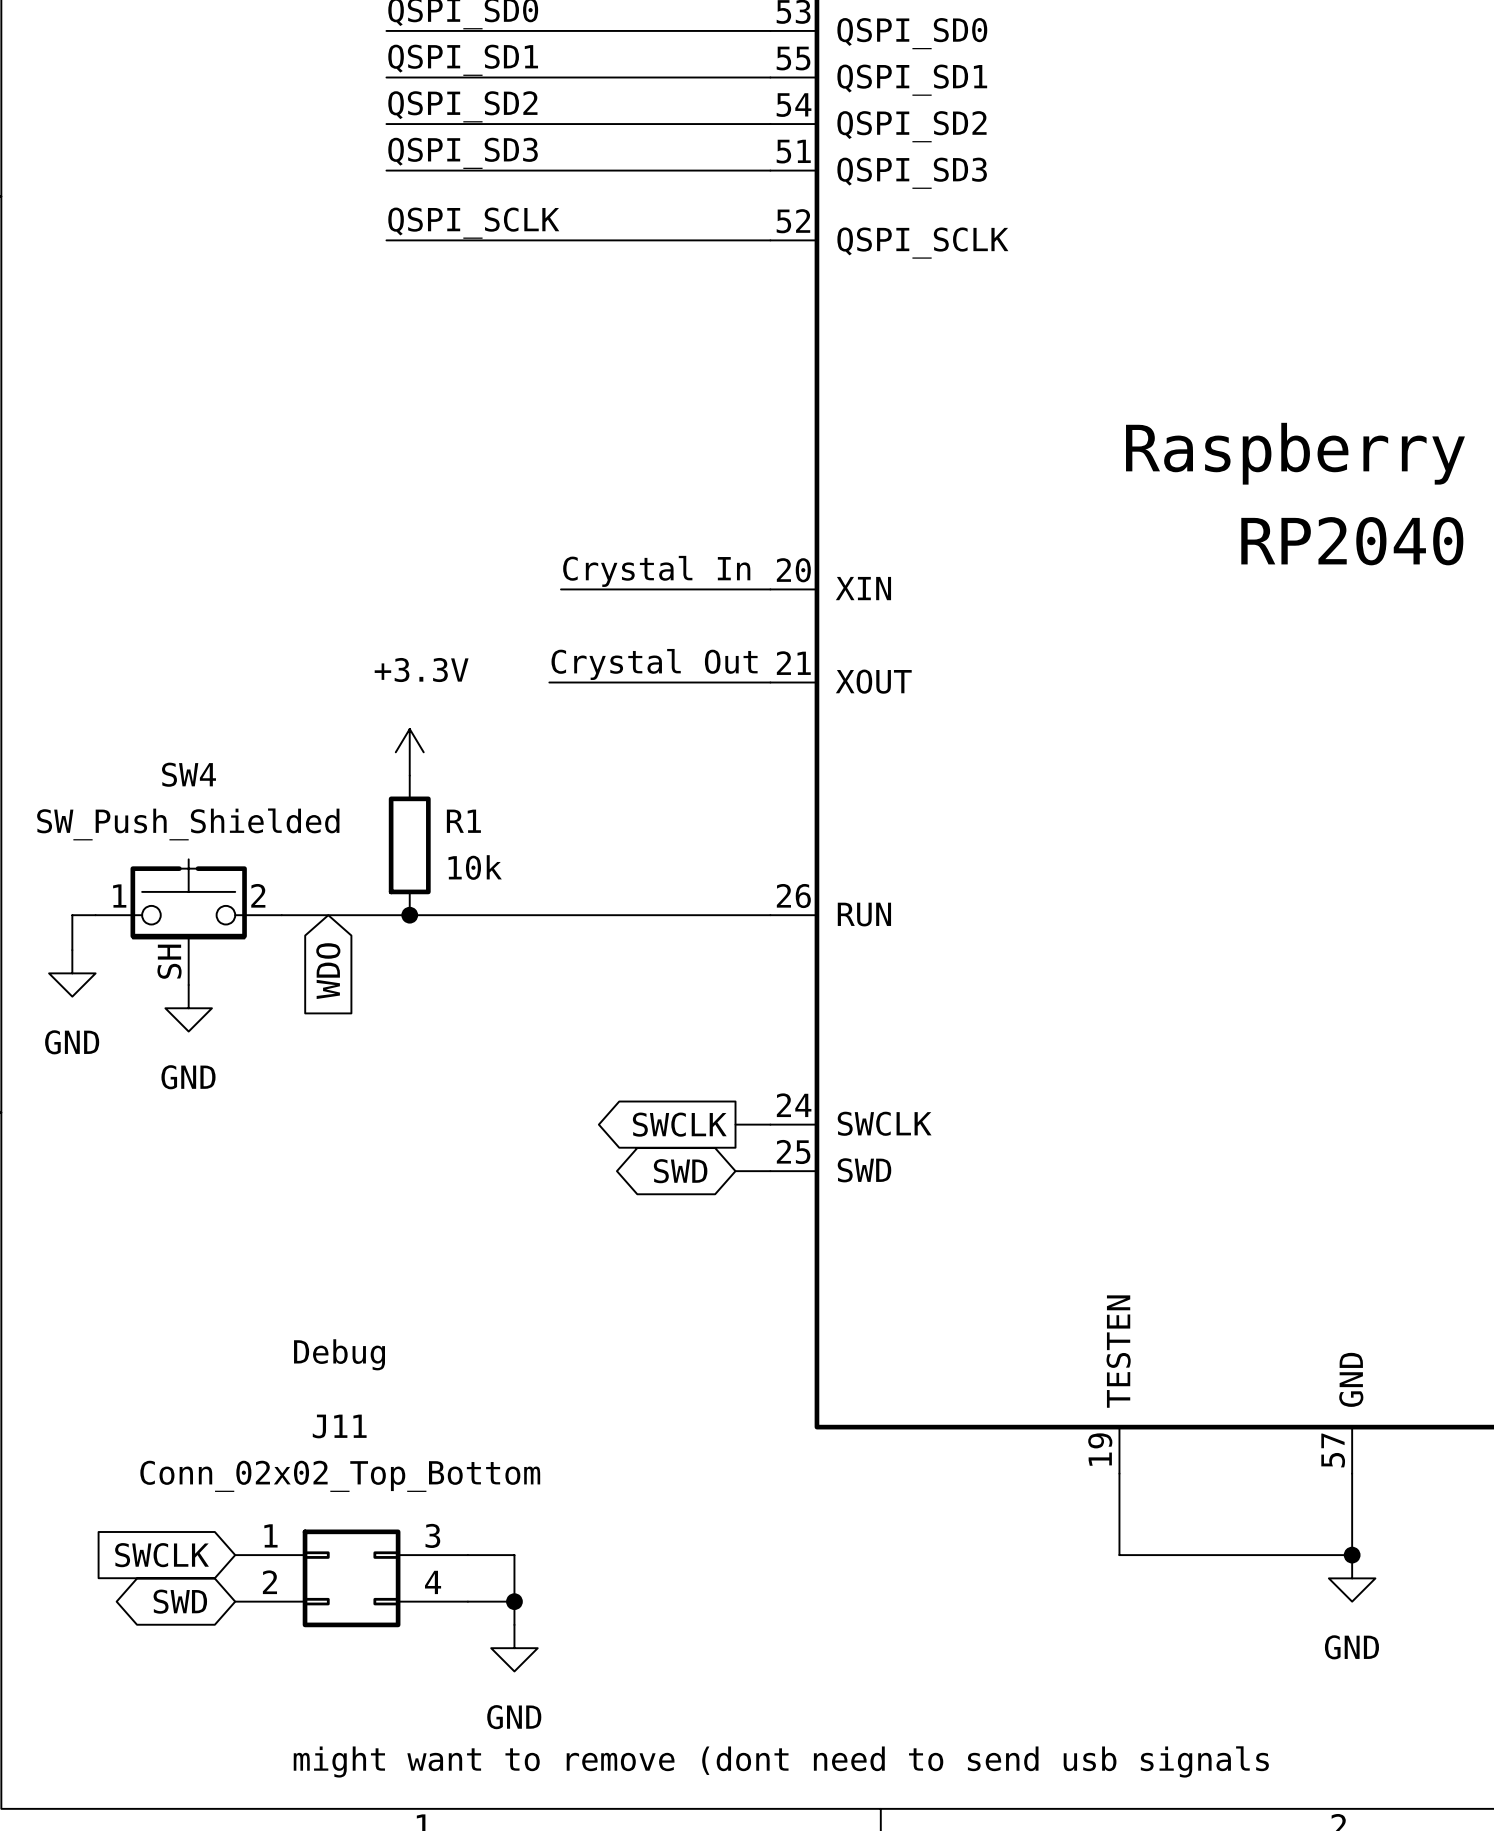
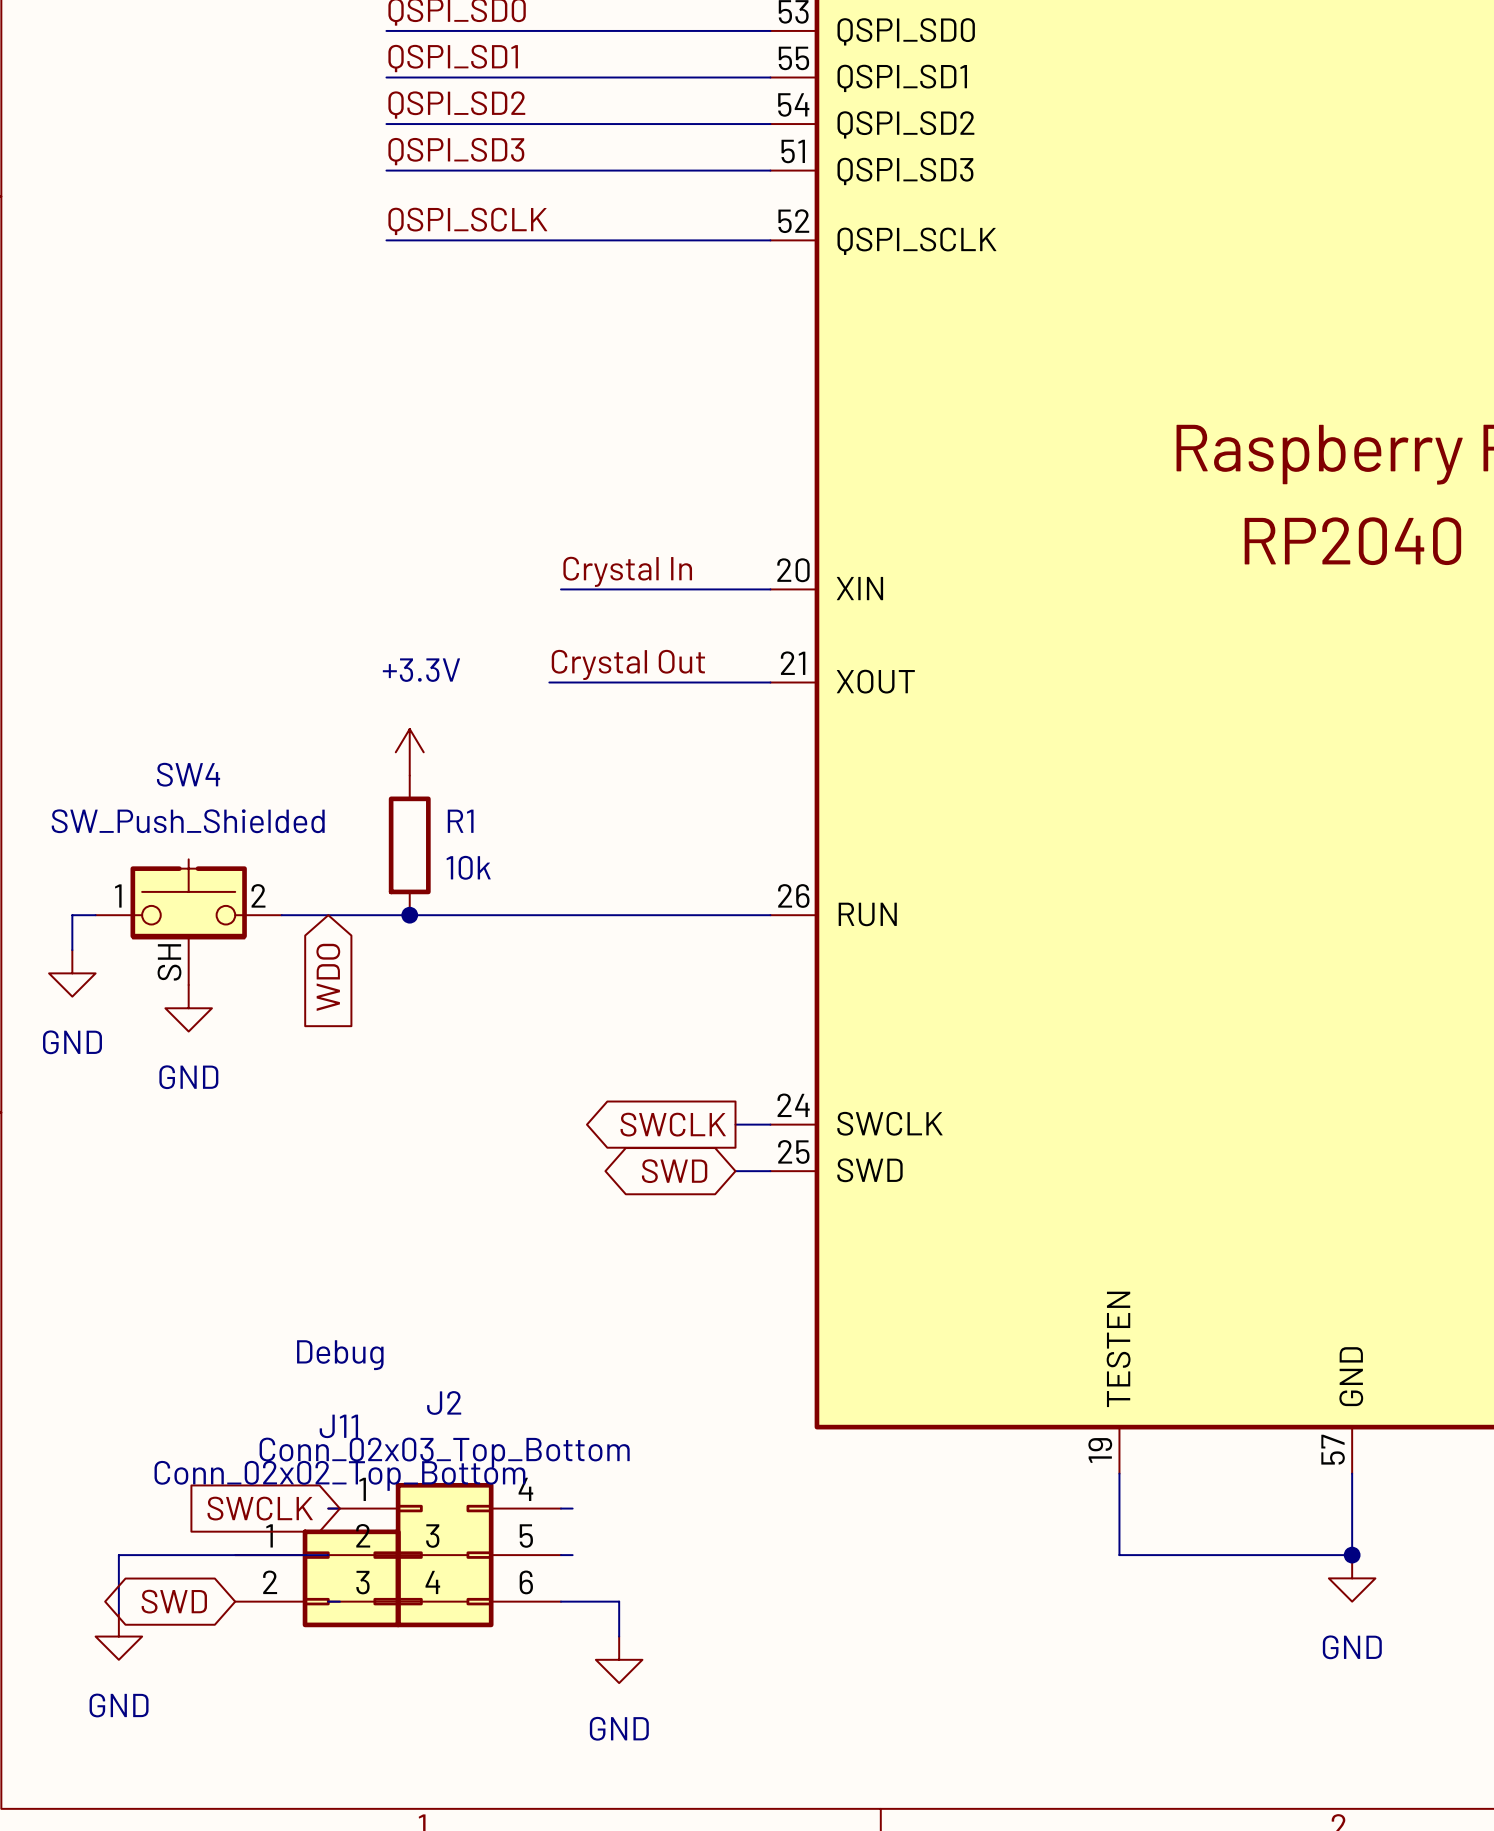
wire: none -> (328, 1508) (339, 1508)
wire: none -> (560, 1508) (572, 1508)
global label position: SWCLK (162, 1555) -> SWCLK (260, 1508)
wire: none -> (328, 1555) (118, 1555) (118, 1613)
J2: none -> Conn_02x03_Top_Bottom (444, 1555)
wire: (467, 1555) (514, 1555) (514, 1624) -> none
wire: none -> (560, 1555) (572, 1555)
junction: (514, 1601) -> none
wire: none -> (560, 1601) (619, 1601) (619, 1636)
power symbol: none -> GND (118, 1636)
power symbol position: GND (514, 1648) -> GND (619, 1659)
text: might want to remove (dont need to send usb signals (781, 1761) -> none

